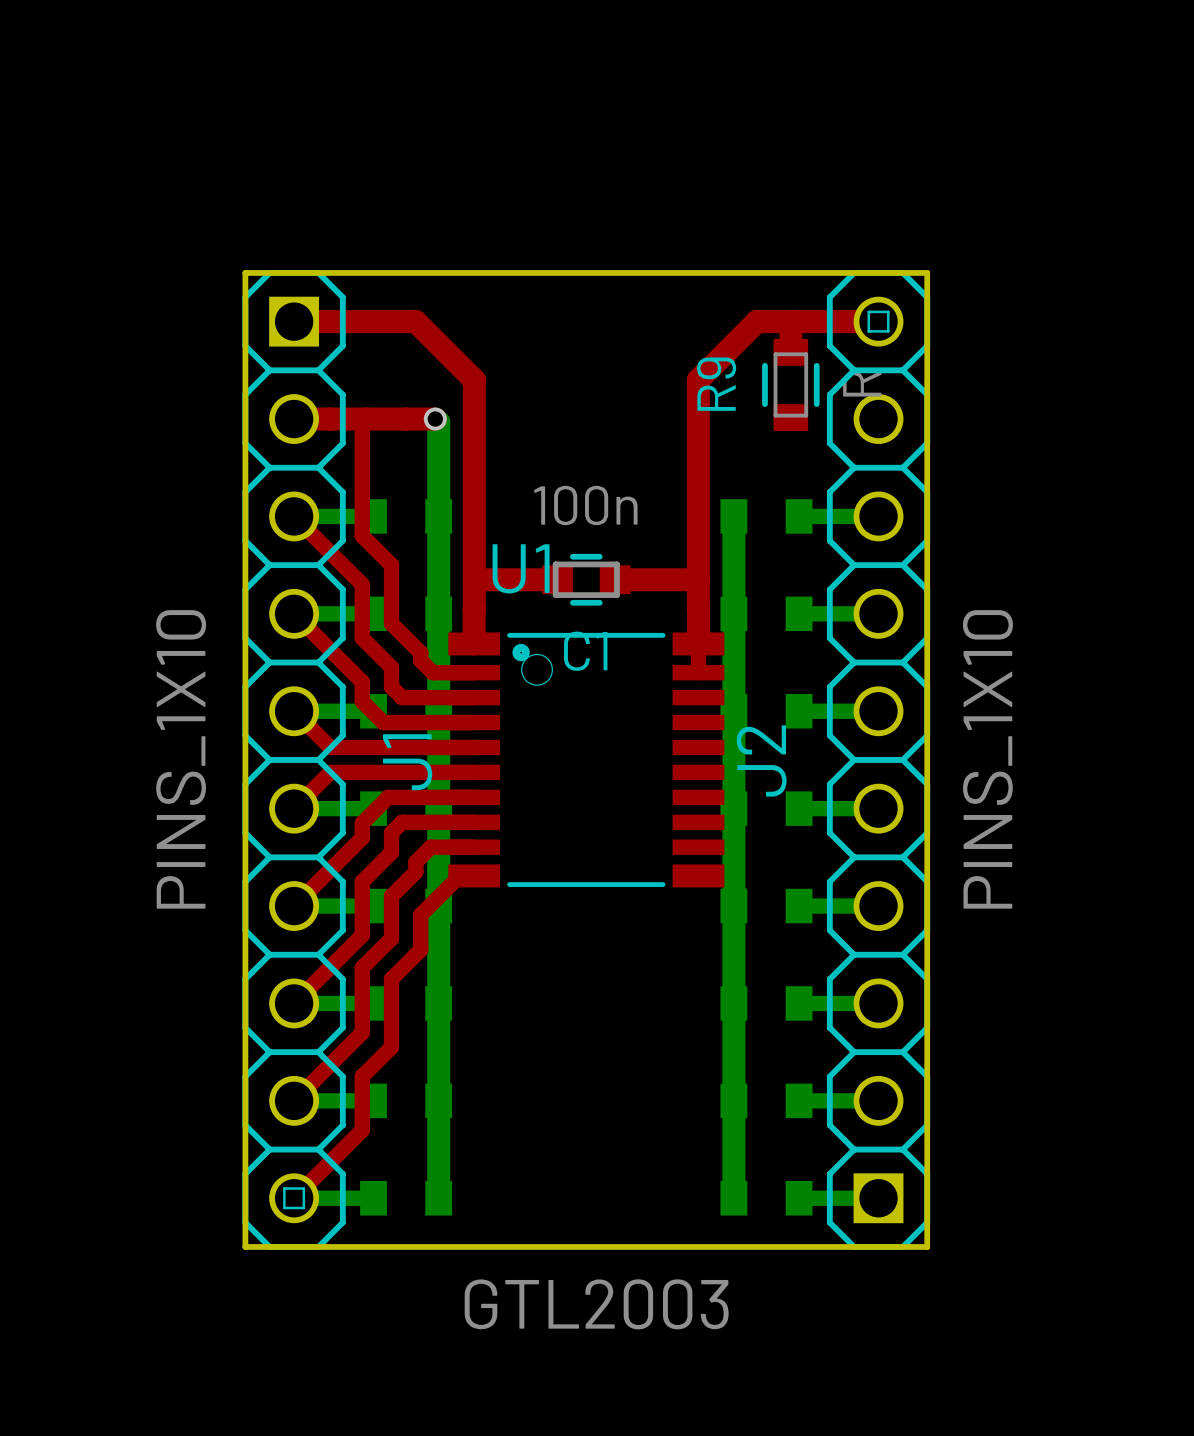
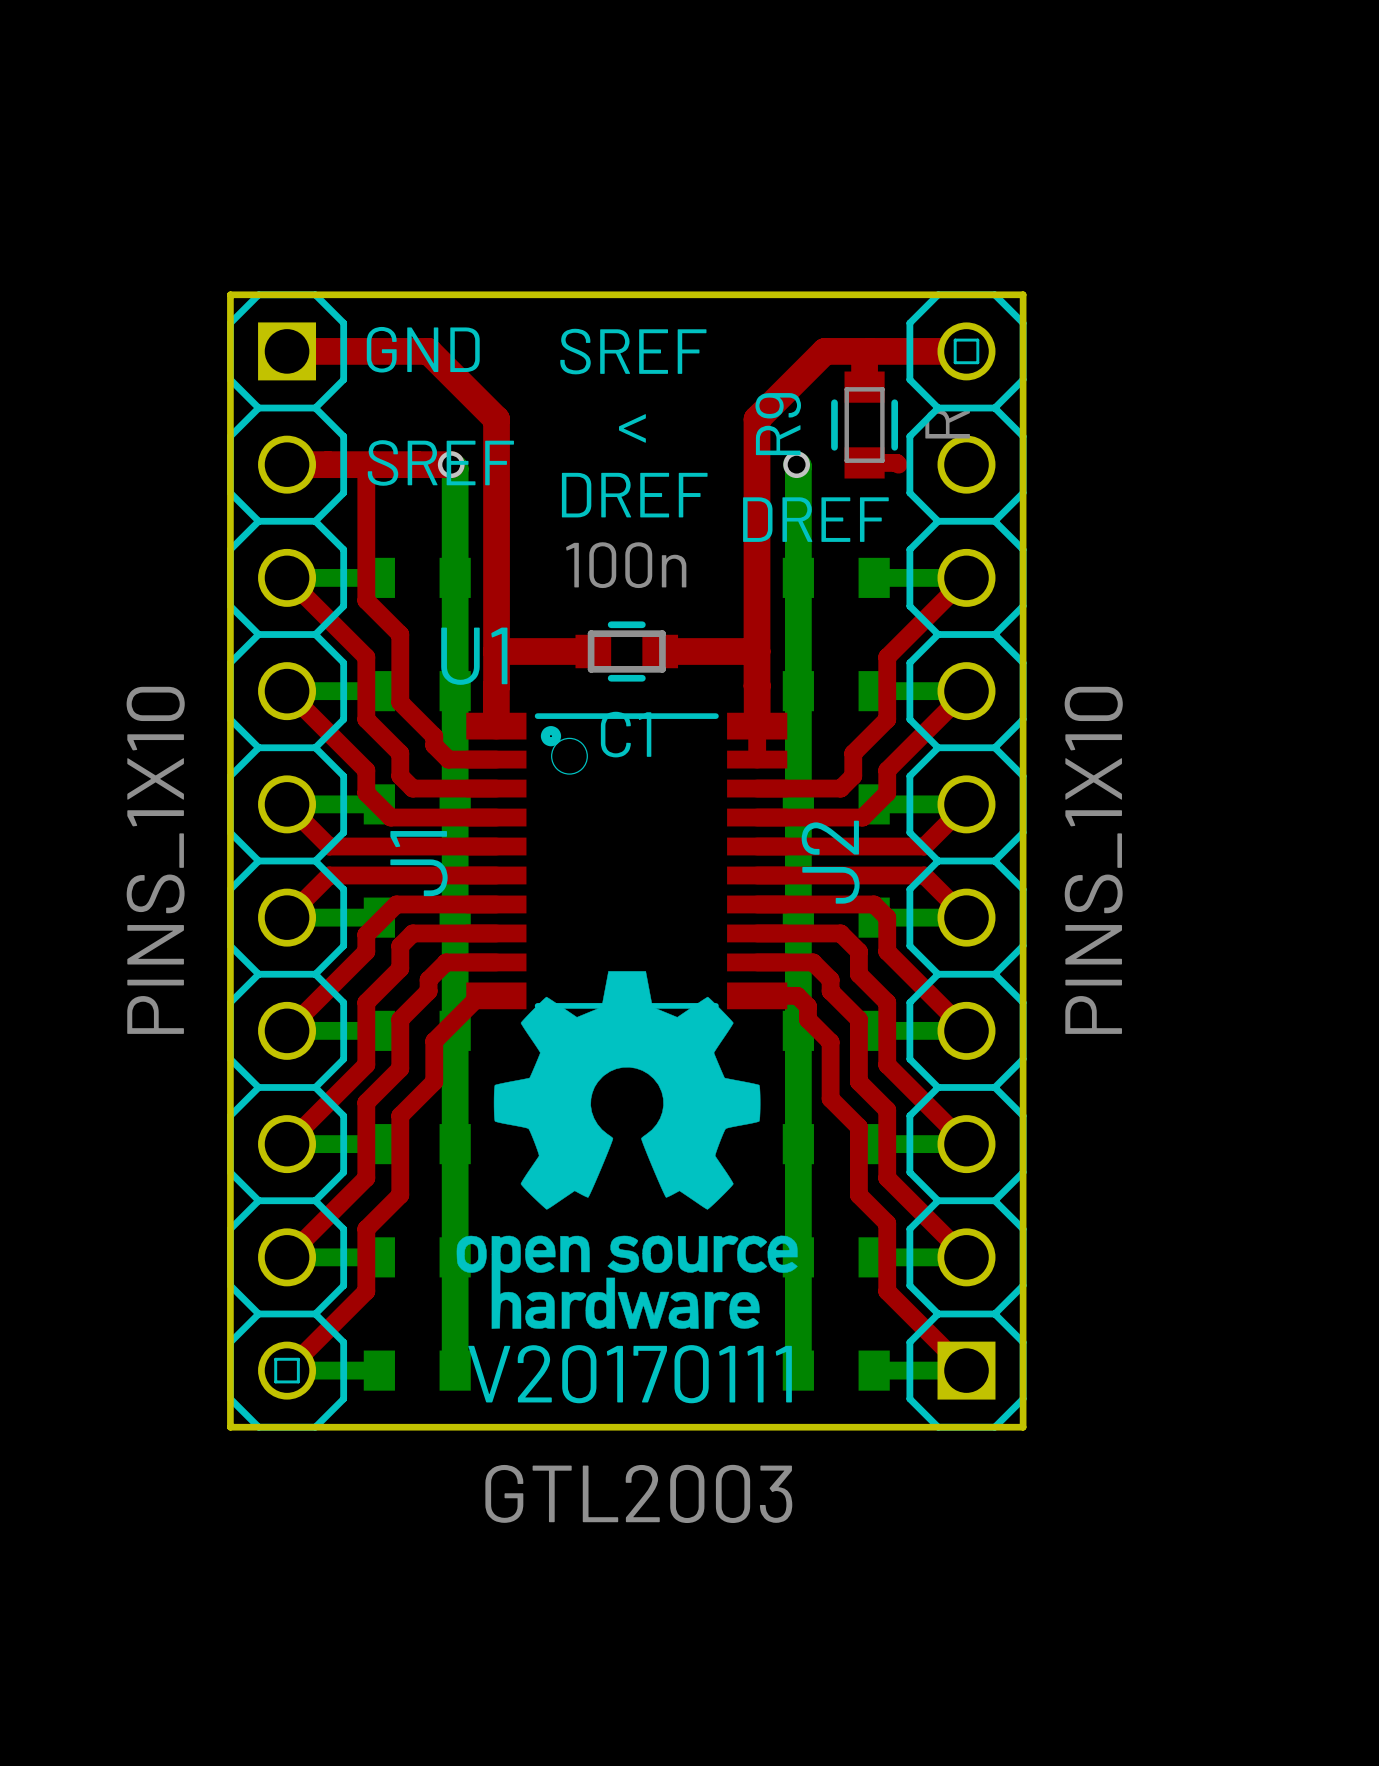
text: none -> GND (423, 349)
text: none -> SREF (633, 351)
text: none -> < (632, 428)
text: none -> SREF (440, 462)
top track: none -> (864, 462) (896, 462) (898, 464)
bottom track: none -> (796, 464) (798, 466) (798, 577)
via: none -> (796, 464)
text: none -> DREF (634, 495)
text: none -> DREF (815, 519)
top track: none -> (966, 577) (887, 657) (887, 719) (853, 753) (853, 776) (840, 788) (757, 788)
U1 name position: U1 (521, 568) -> U1 (474, 656)
top track: none -> (966, 691) (887, 770) (887, 793) (862, 817) (757, 817)
top track: none -> (966, 804) (924, 846) (757, 846)
top track: none -> (757, 875) (924, 875) (966, 917)
top track: none -> (757, 904) (874, 904) (887, 917) (887, 951) (966, 1030)
top track: none -> (757, 933) (840, 933) (858, 951) (858, 974) (887, 1002) (887, 1064) (966, 1144)
top track: none -> (757, 962) (813, 962) (830, 979) (830, 991) (858, 1019) (858, 1081) (887, 1110) (887, 1178) (966, 1257)
drawing: none -> [456, 971, 798, 1329]
top track: none -> (757, 995) (797, 995) (807, 1006) (807, 1019) (830, 1042) (830, 1098) (858, 1127) (858, 1195) (887, 1223) (887, 1291) (966, 1370)
text: none -> V20170111 (630, 1374)

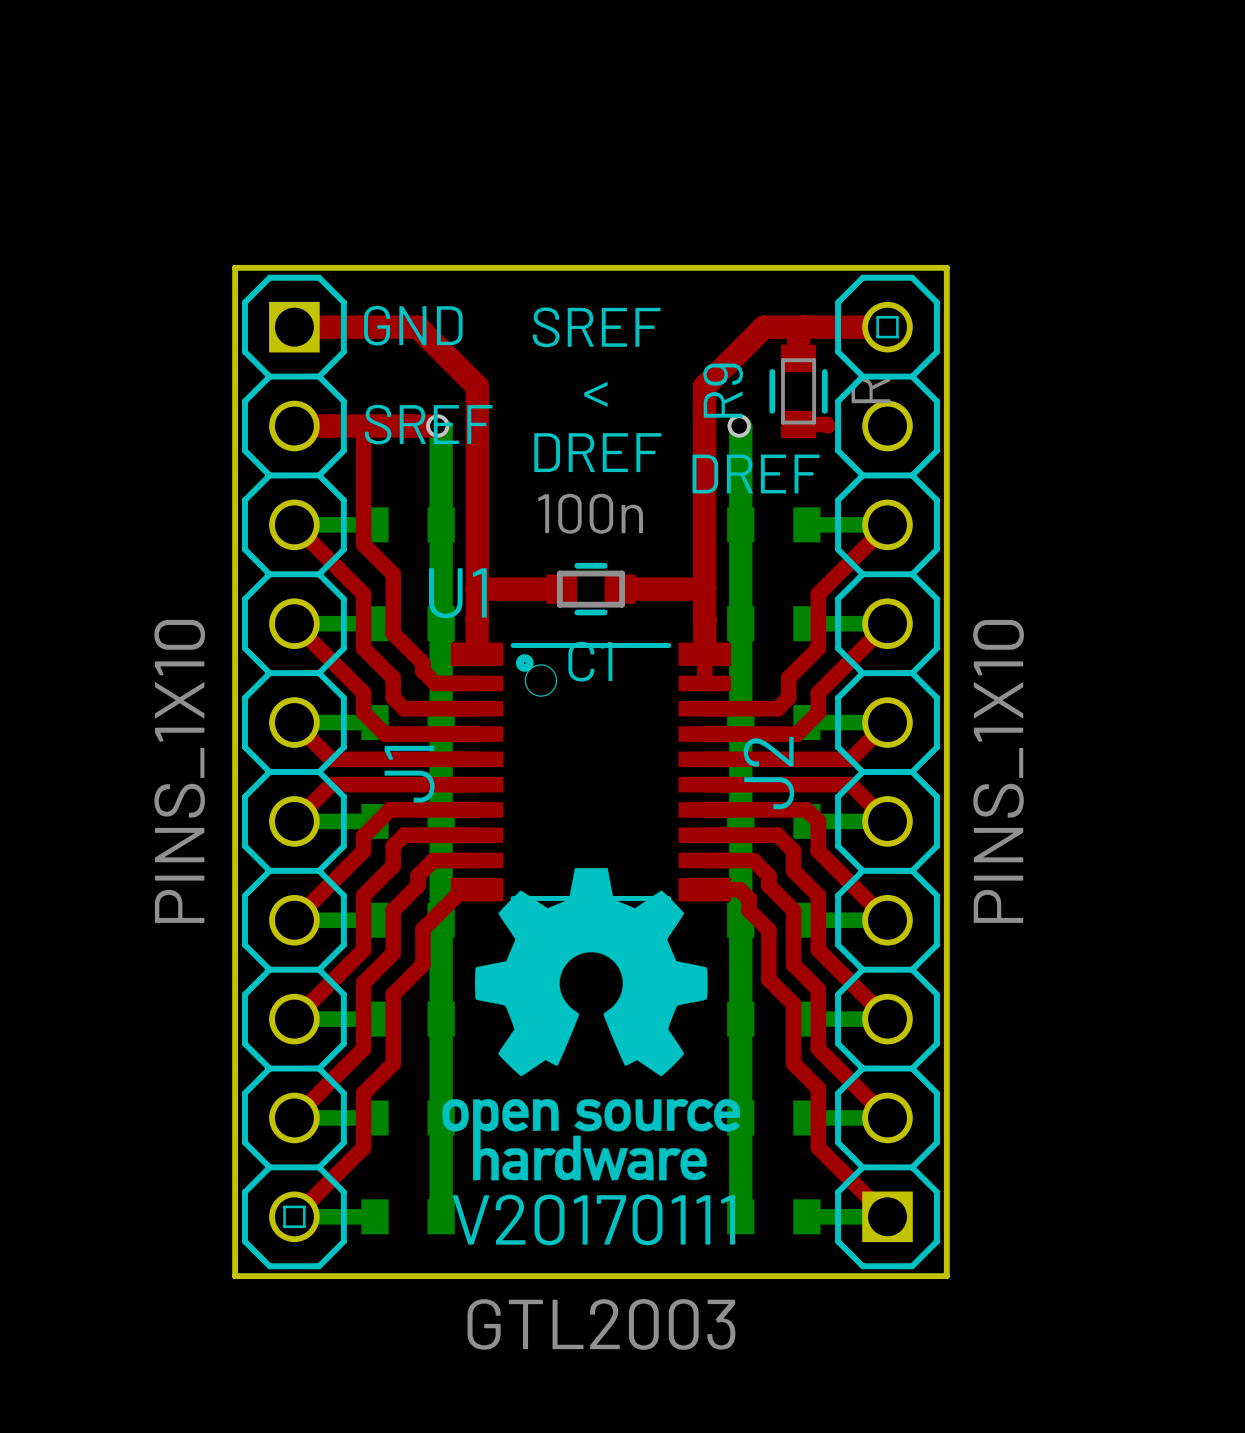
board edge: (230, 294) (230, 1427) (1023, 1427) (1023, 294) (230, 294) -> (235, 267) (235, 1276) (946, 1276) (946, 267) (235, 267)

